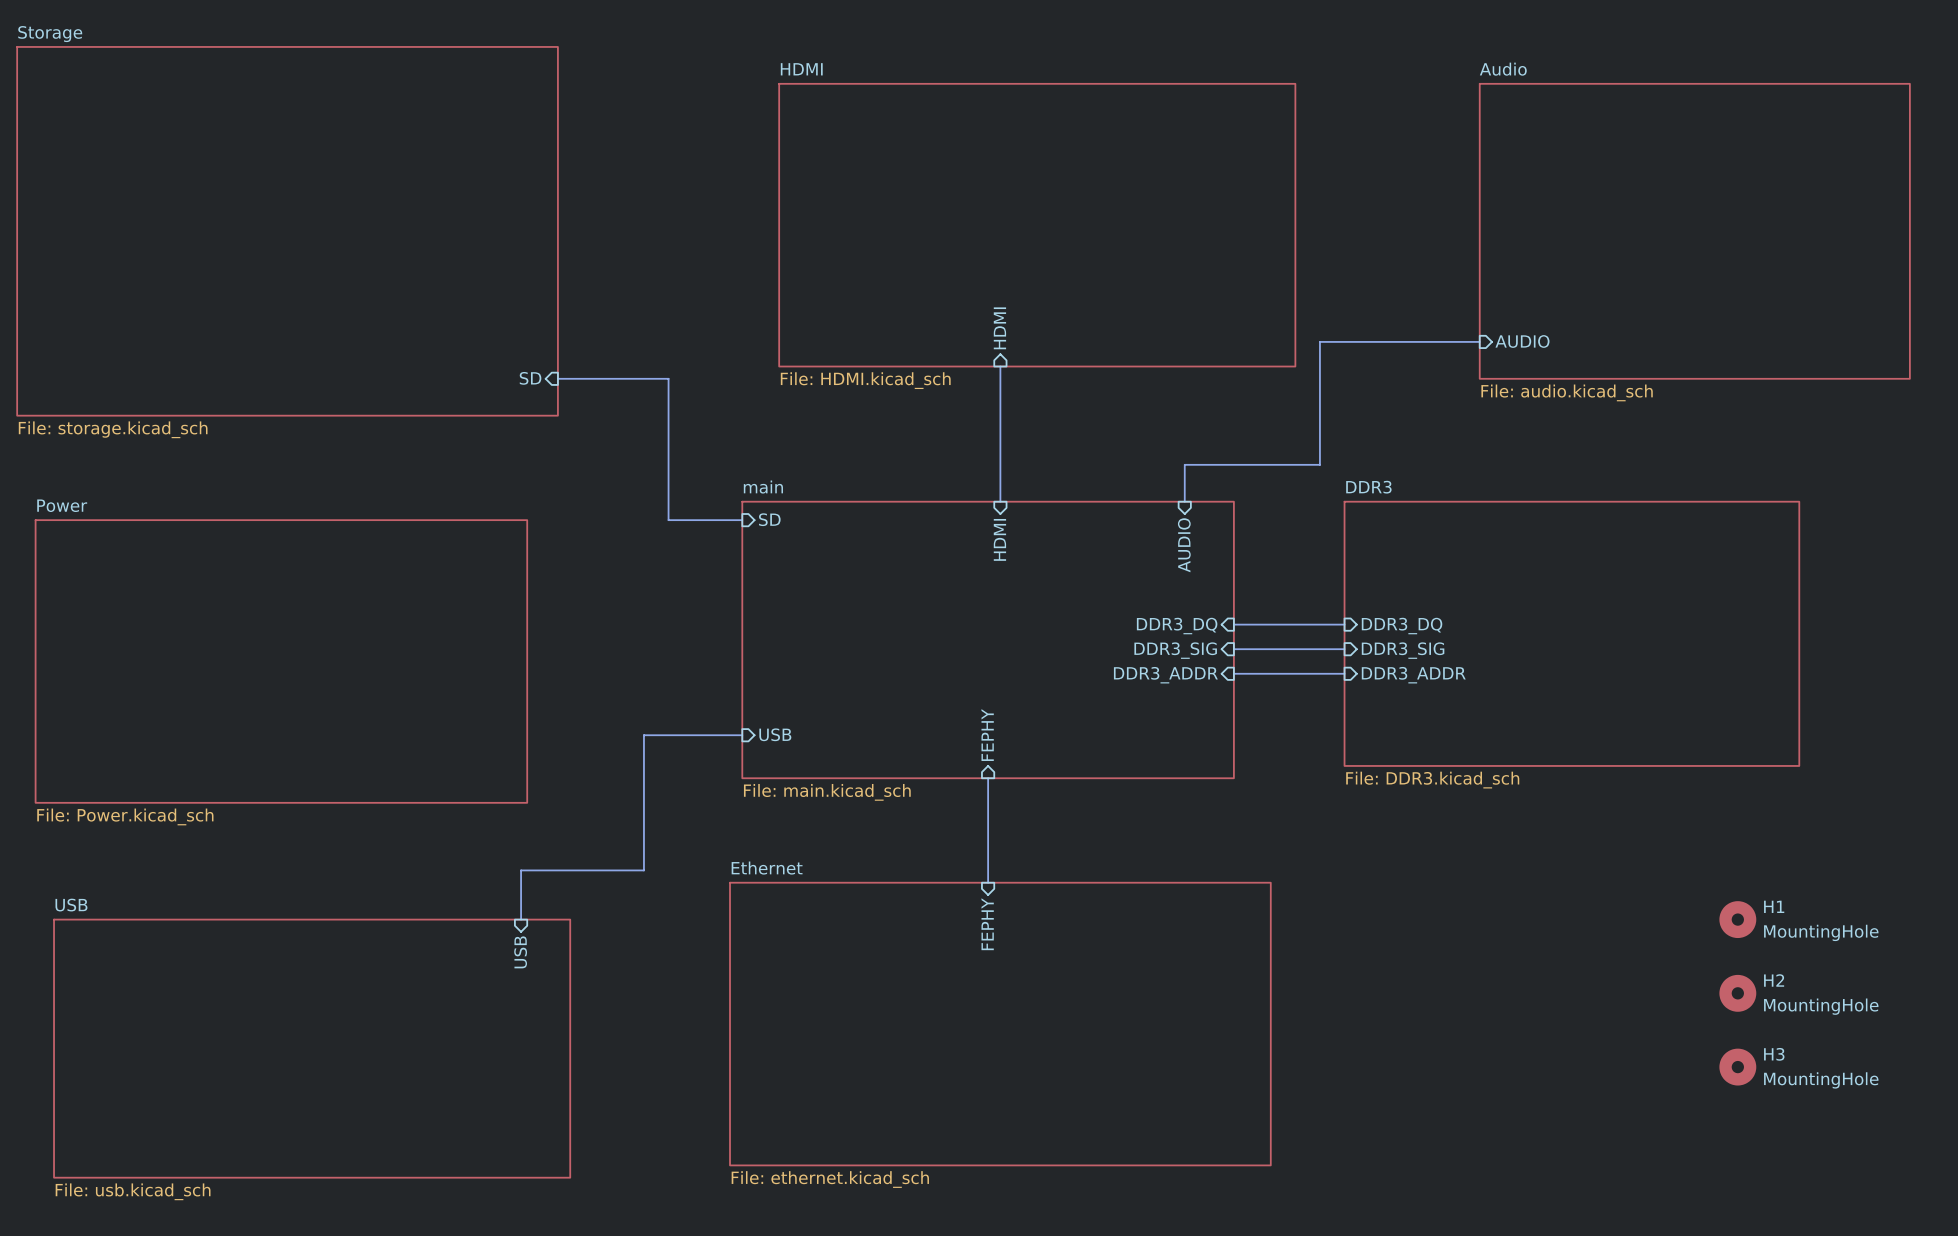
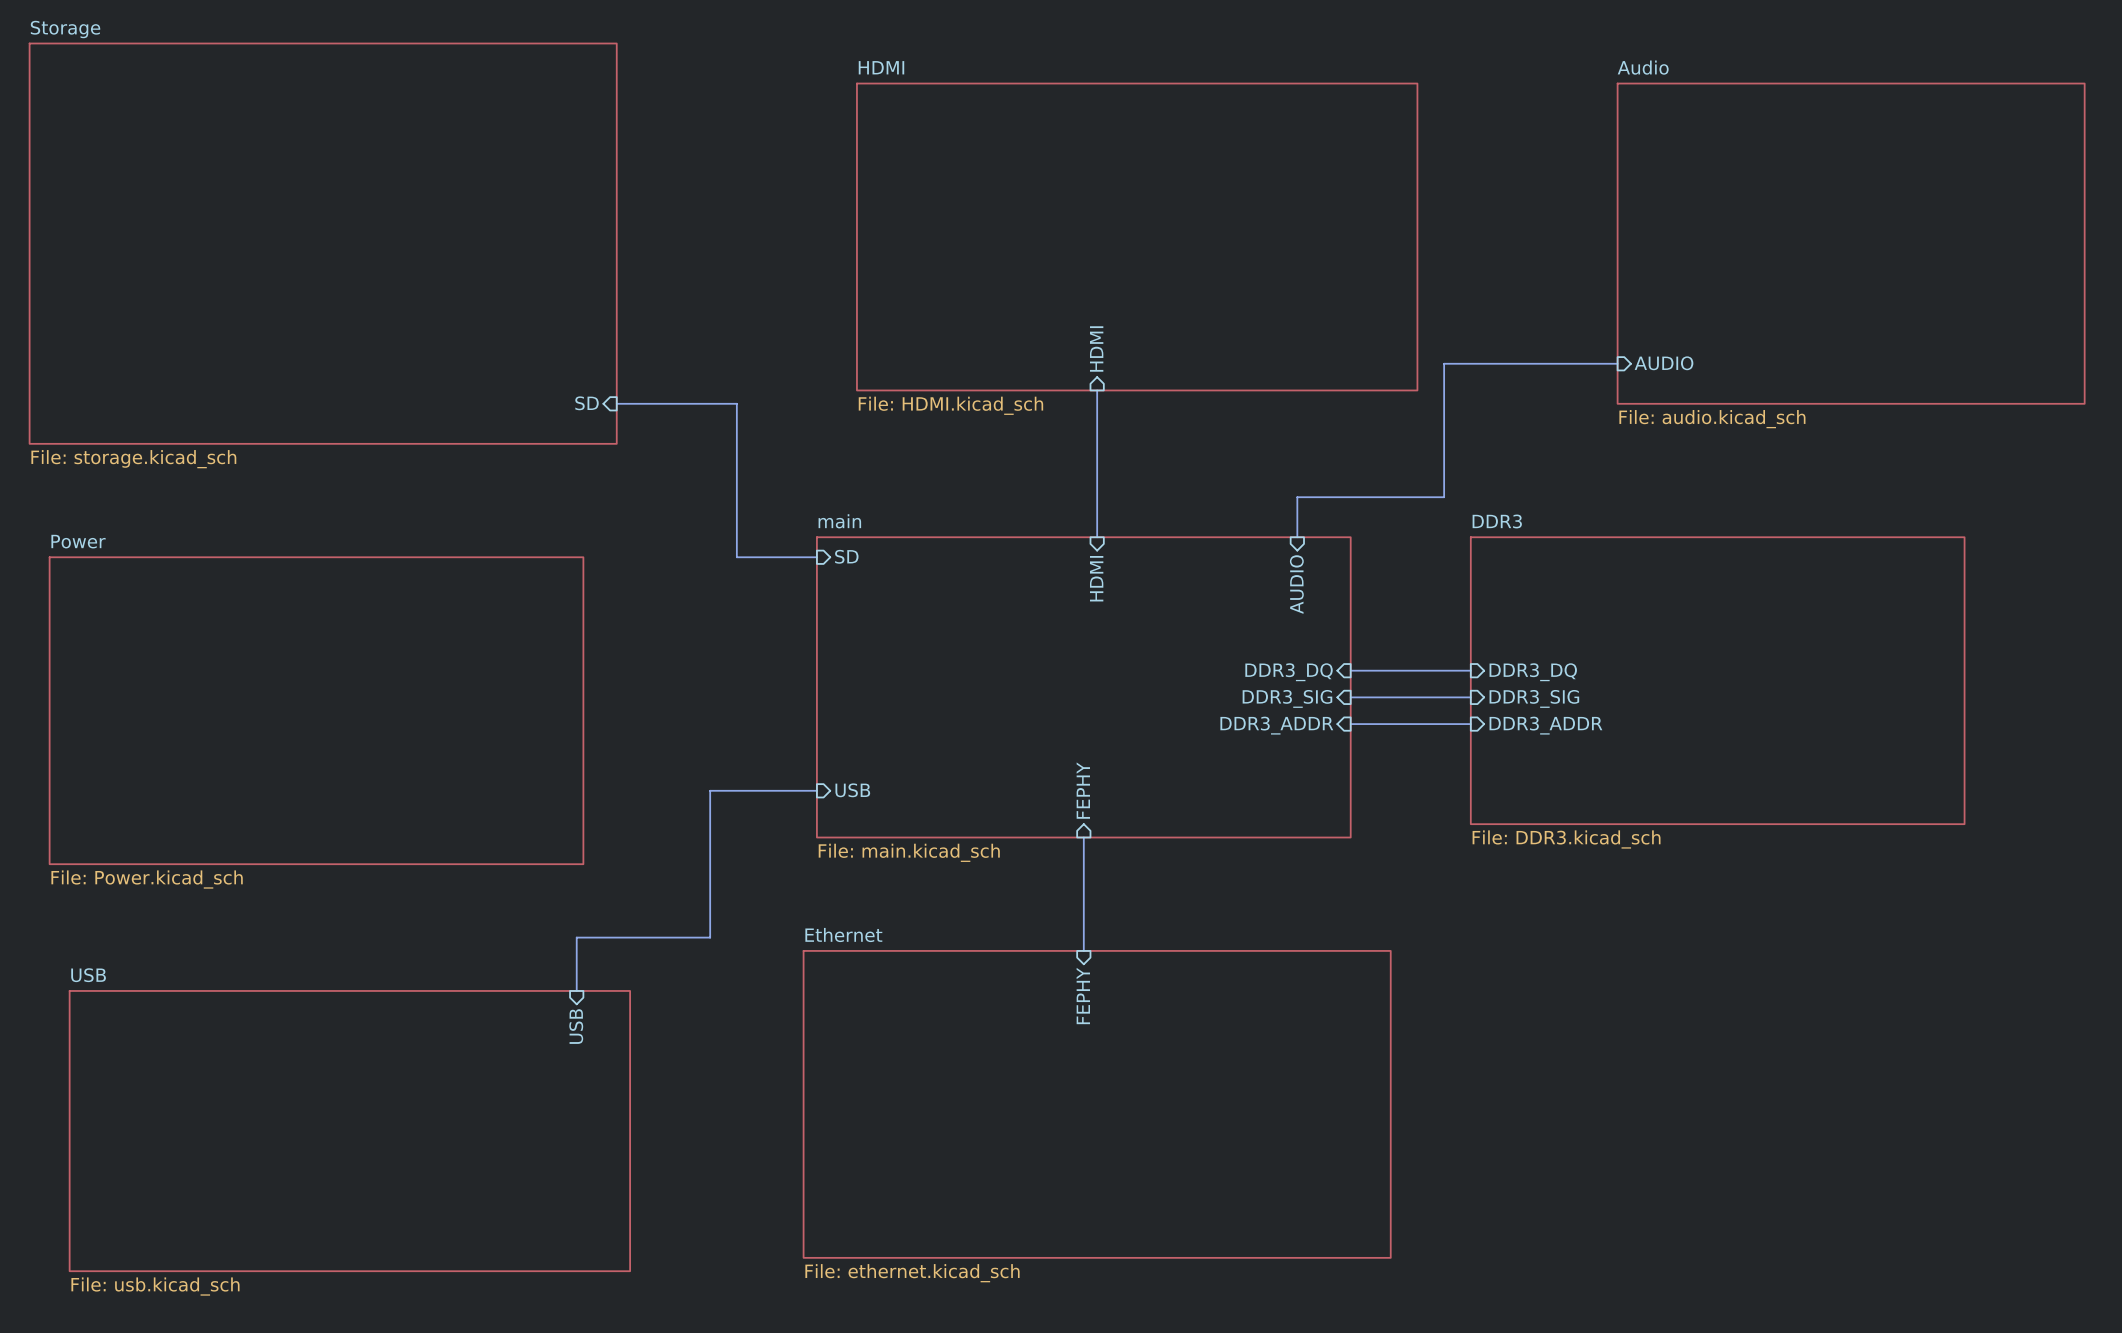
H1: MountingHole (1737, 919) -> none
H2: MountingHole (1737, 993) -> none
H3: MountingHole (1737, 1067) -> none

